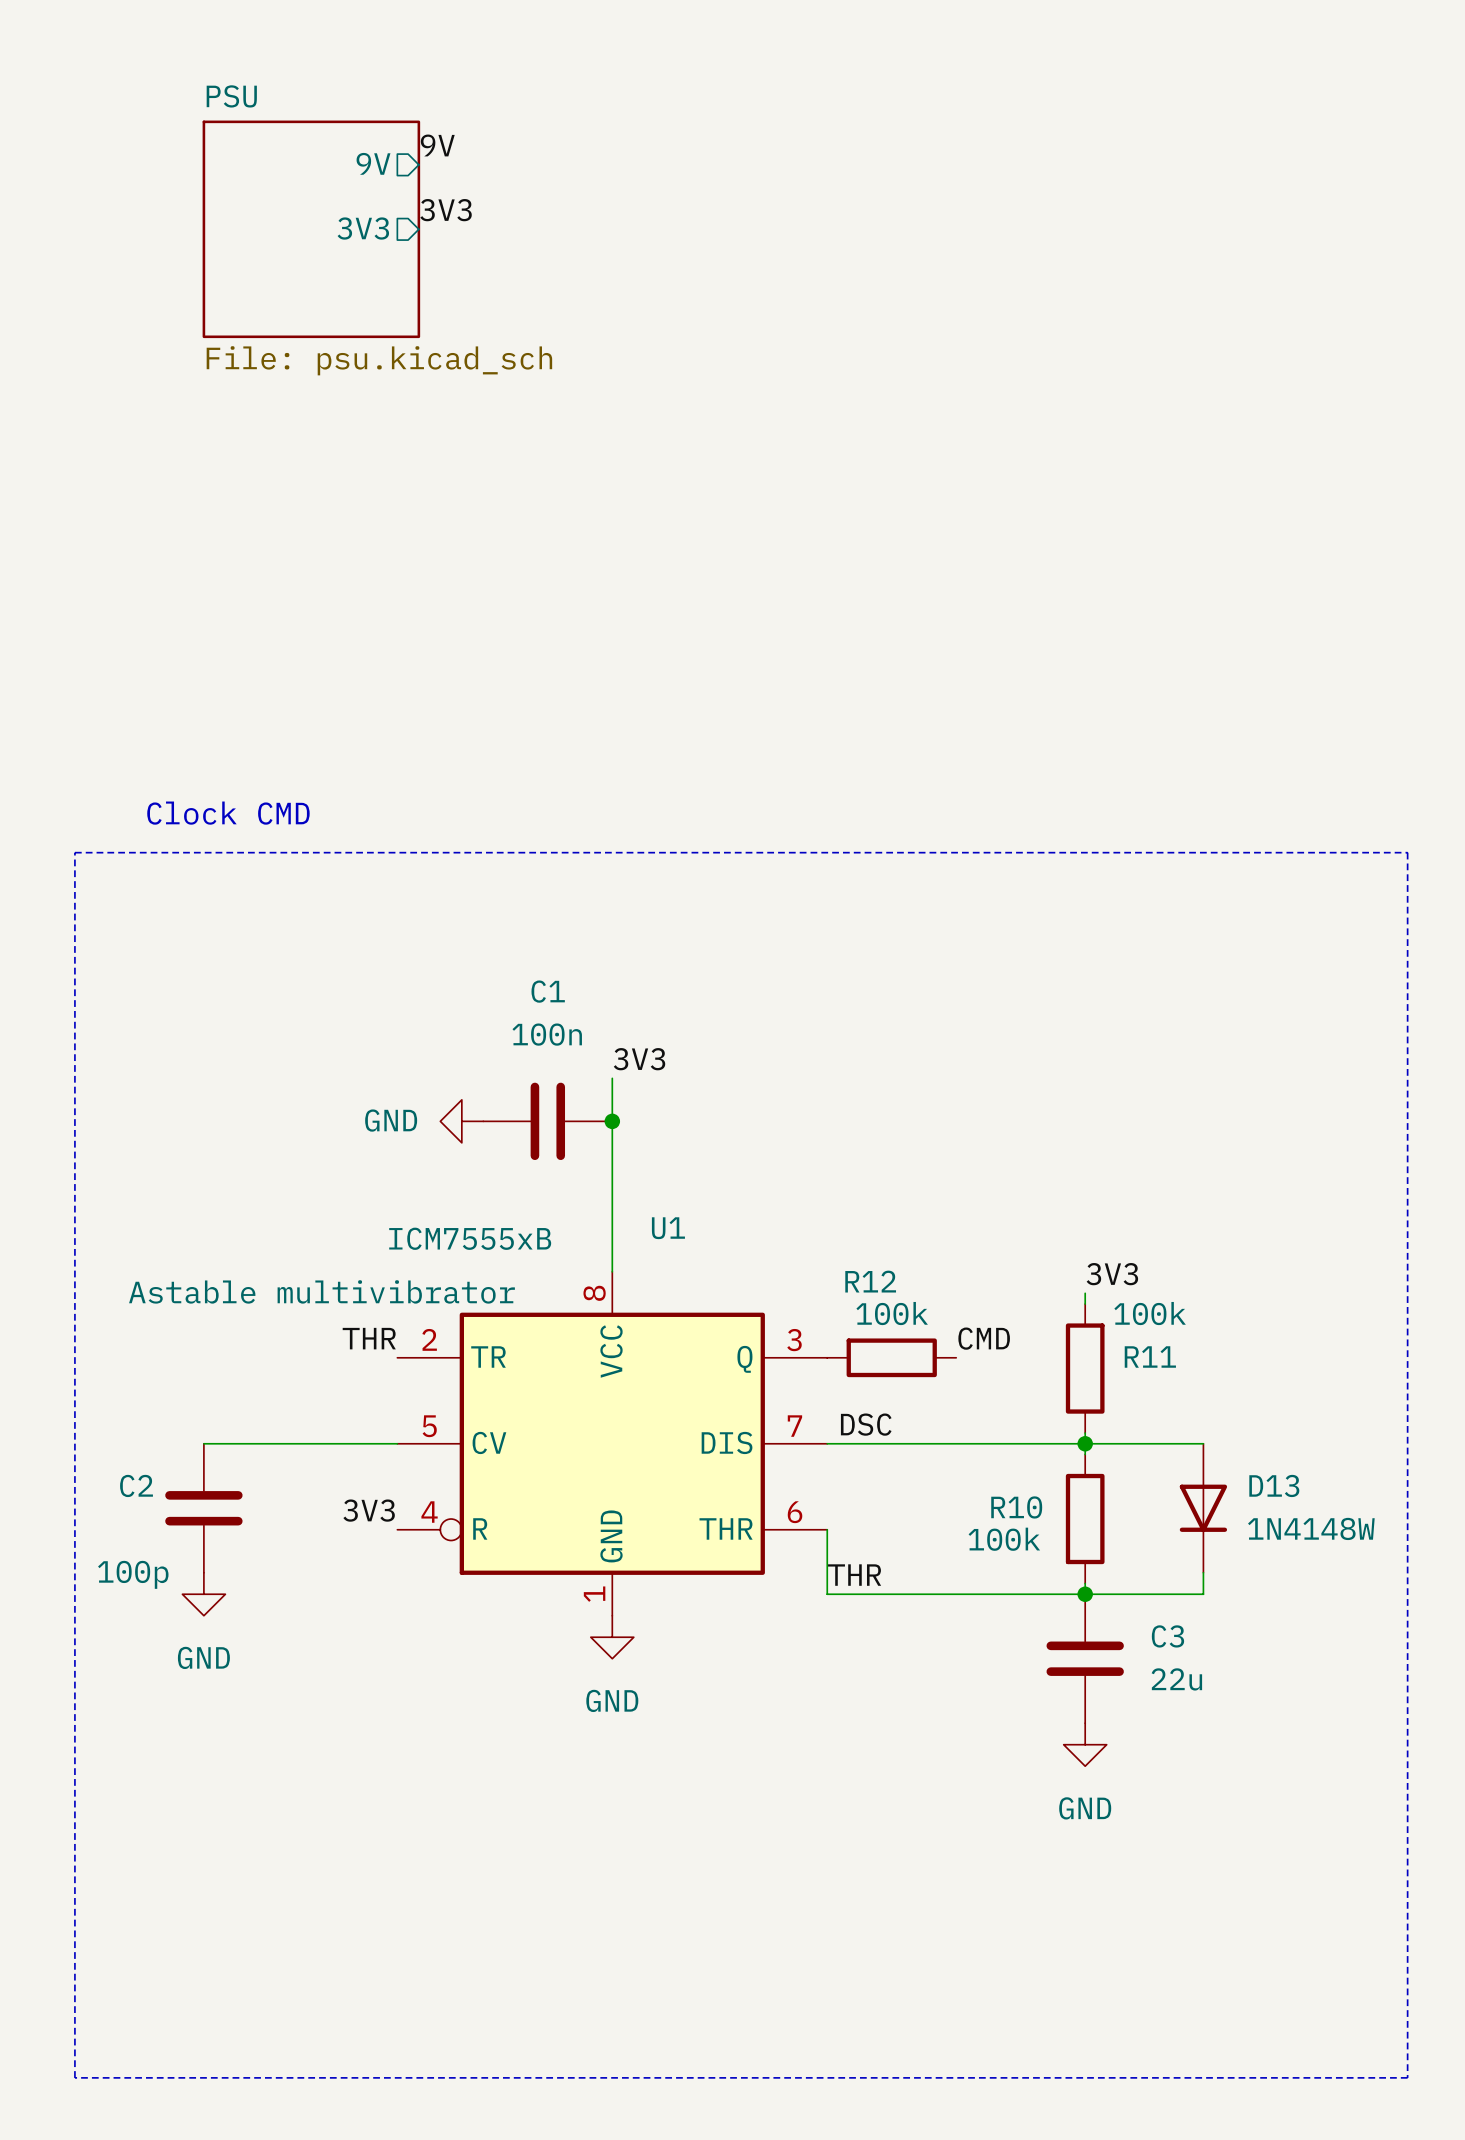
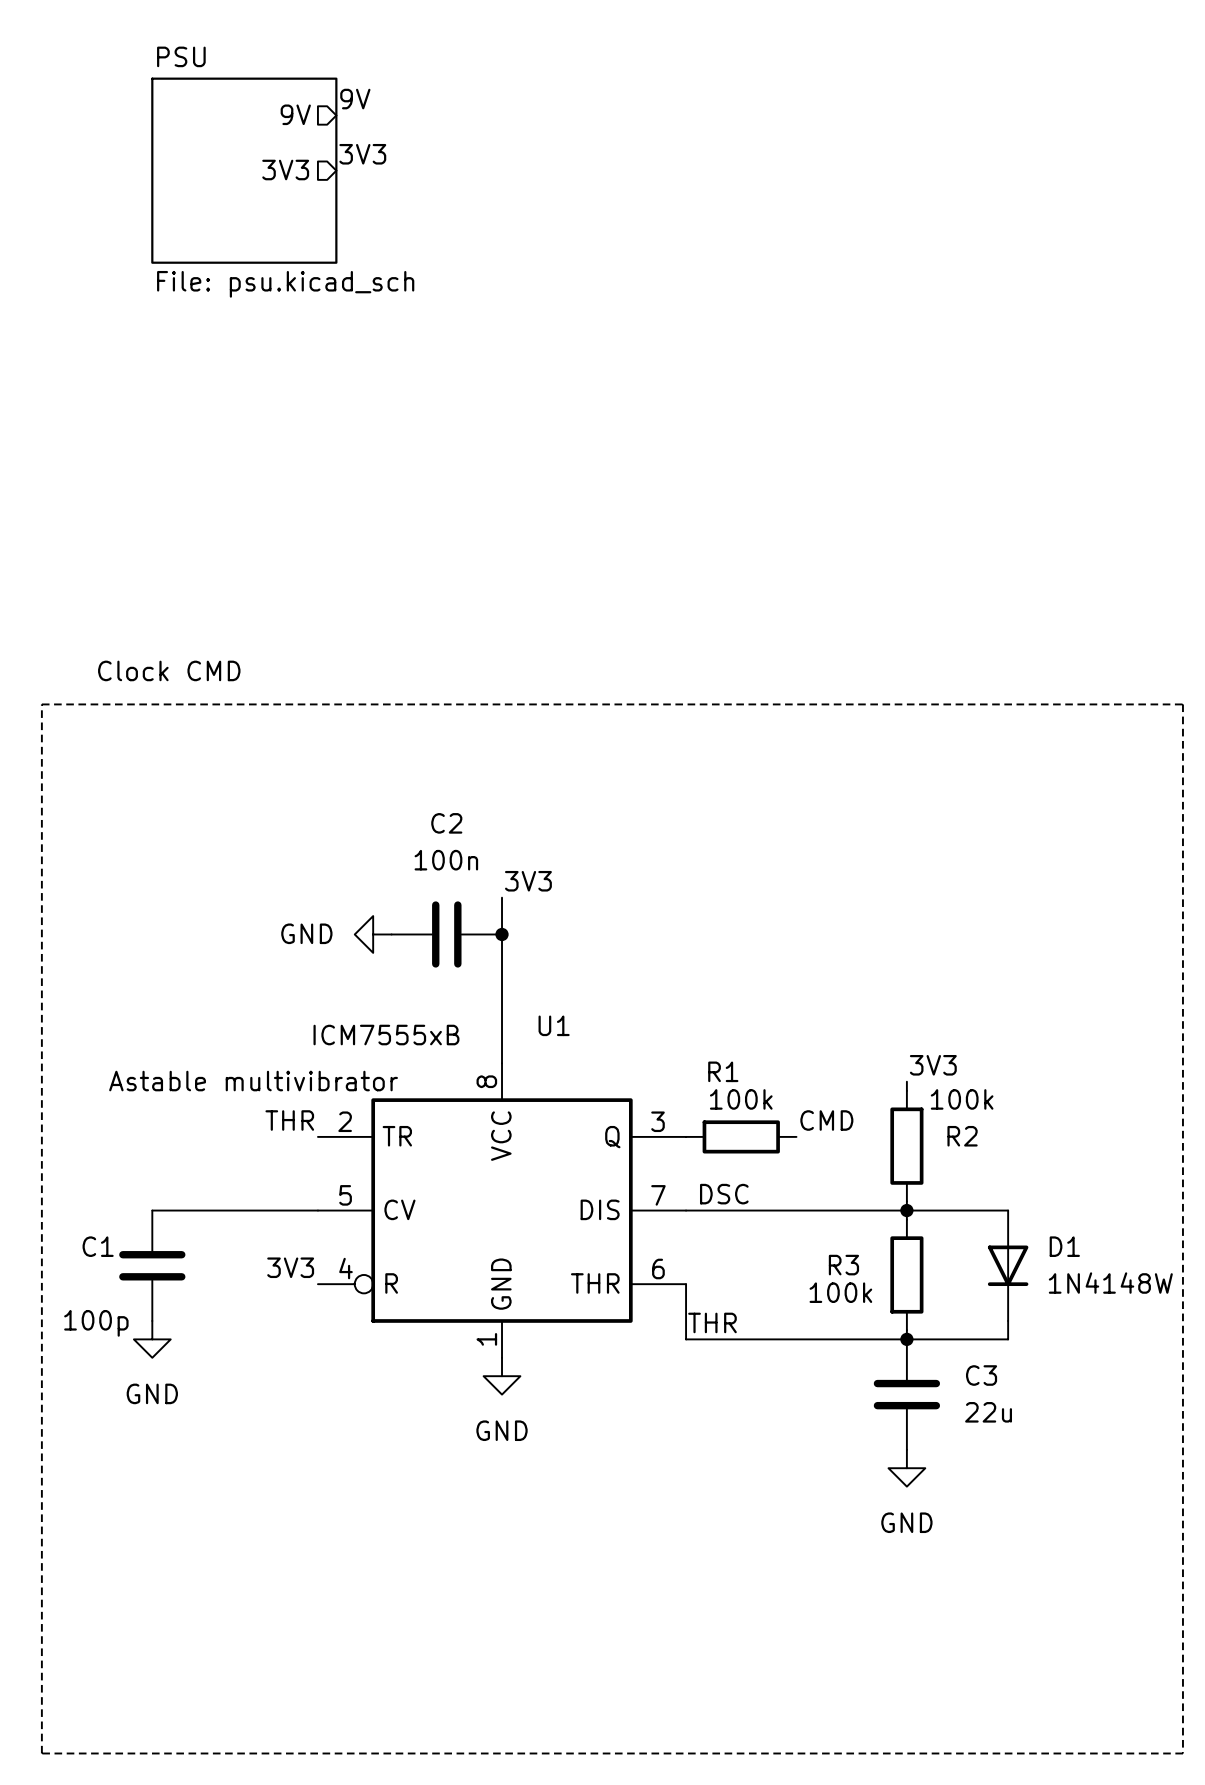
C1 name: C1 (548, 991) -> C2 (446, 823)
R12 name: R12 (870, 1281) -> R1 (723, 1071)
R11 name: R11 (1150, 1357) -> R2 (962, 1136)
C2 name: C2 (136, 1485) -> C1 (98, 1246)
D13 name: D13 (1274, 1485) -> D1 (1064, 1246)
R10 name: R10 (1016, 1507) -> R3 (843, 1265)

